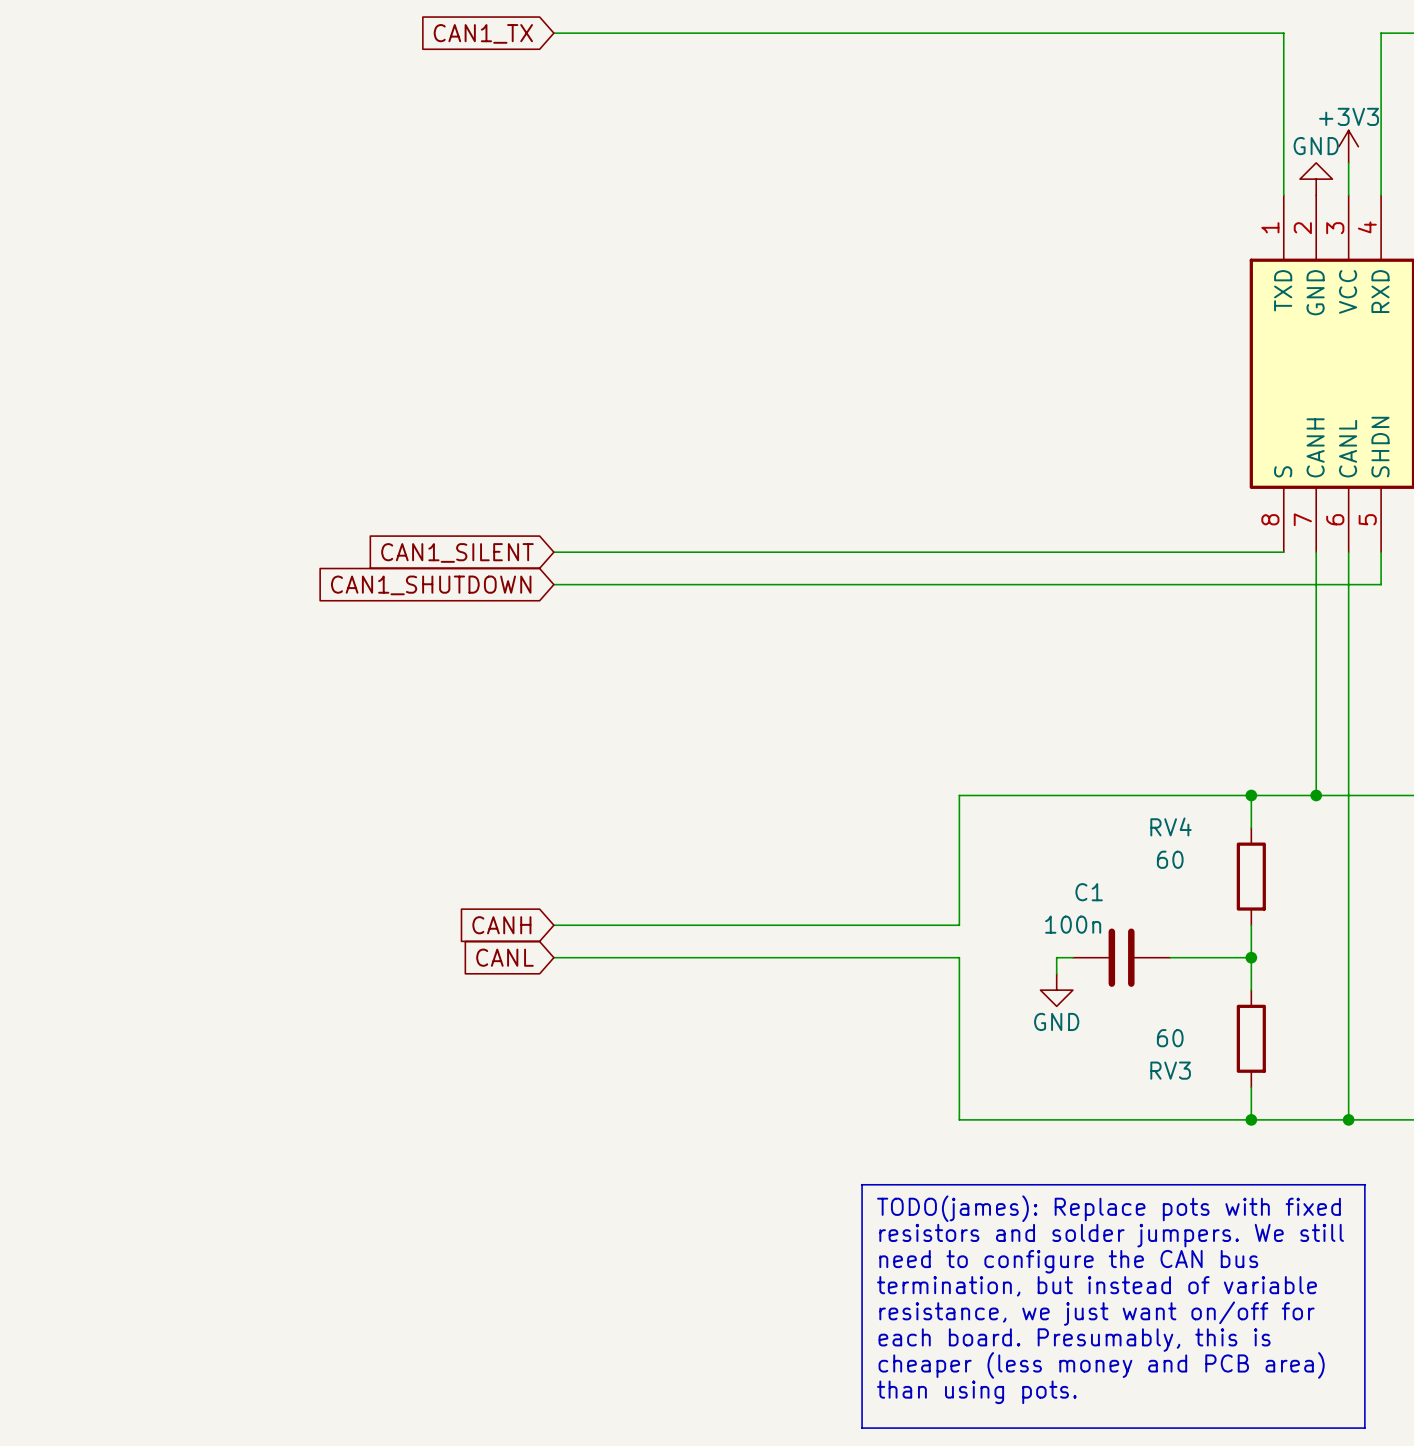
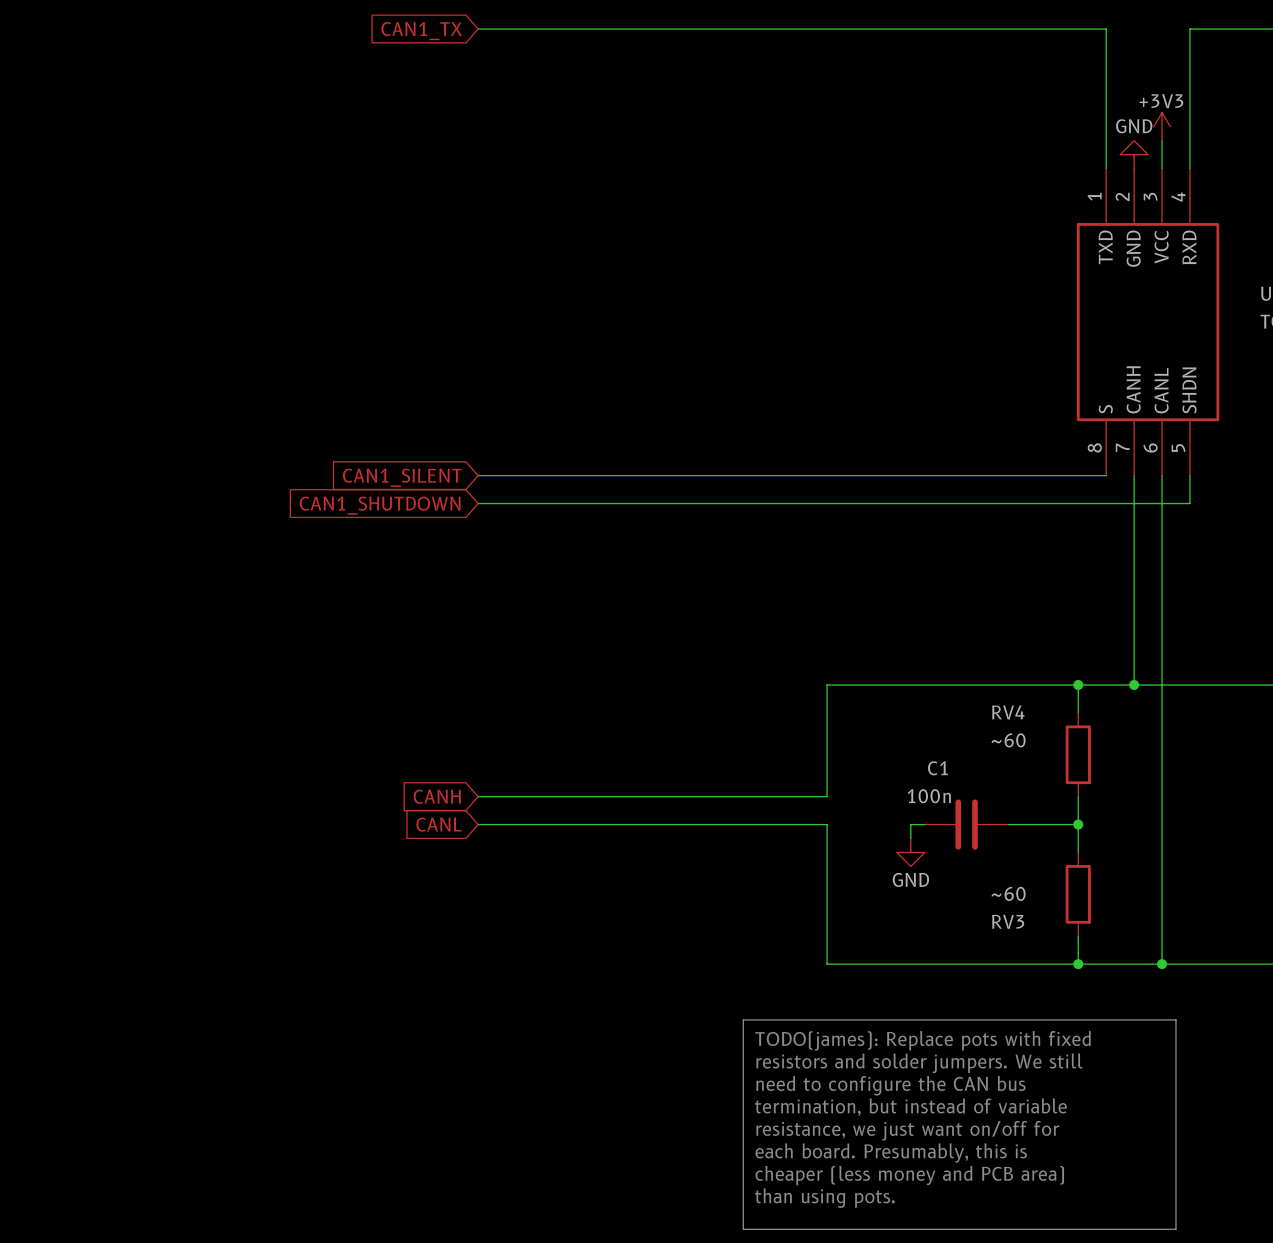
RV4 value: 60 (1170, 859) -> ~60 (1008, 740)
RV3 value: 60 (1170, 1038) -> ~60 (1008, 893)

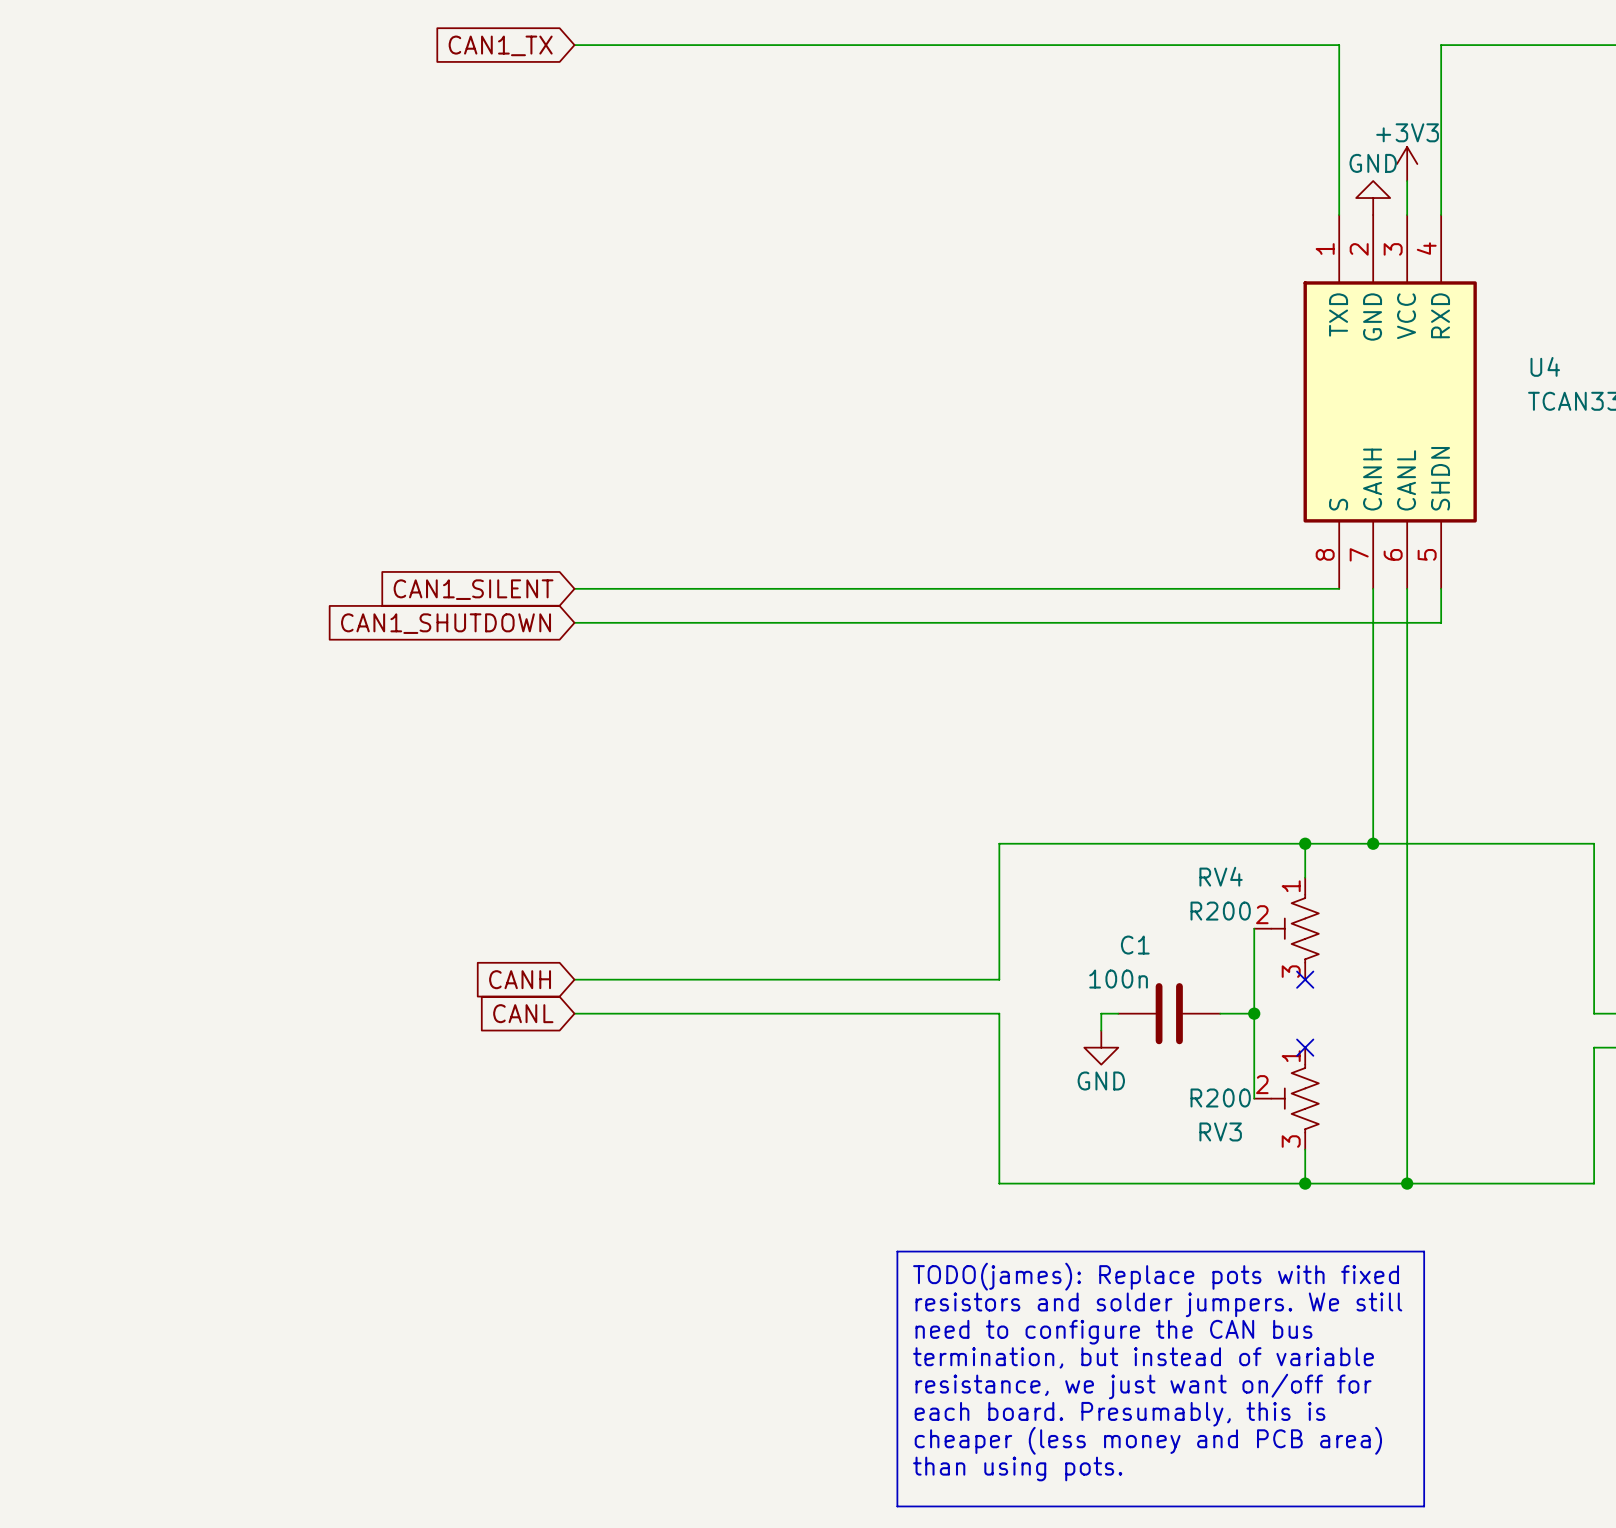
RV4 symbol: [1065, 712, 1091, 797] -> [1254, 877, 1319, 980]
RV4 value: ~60 (1008, 740) -> R200 (1220, 911)
wire: none -> (1254, 928) (1254, 1098)
wire: (1078, 796) (1078, 852) -> none
no-connect mark: none -> (1305, 979)
wire: (1036, 824) (1078, 824) -> none
junction position: (1078, 824) -> (1254, 1013)
RV3 symbol: [1065, 852, 1091, 937] -> [1254, 1047, 1319, 1150]
no-connect mark: none -> (1305, 1047)
RV3 value: ~60 (1008, 893) -> R200 (1220, 1097)

